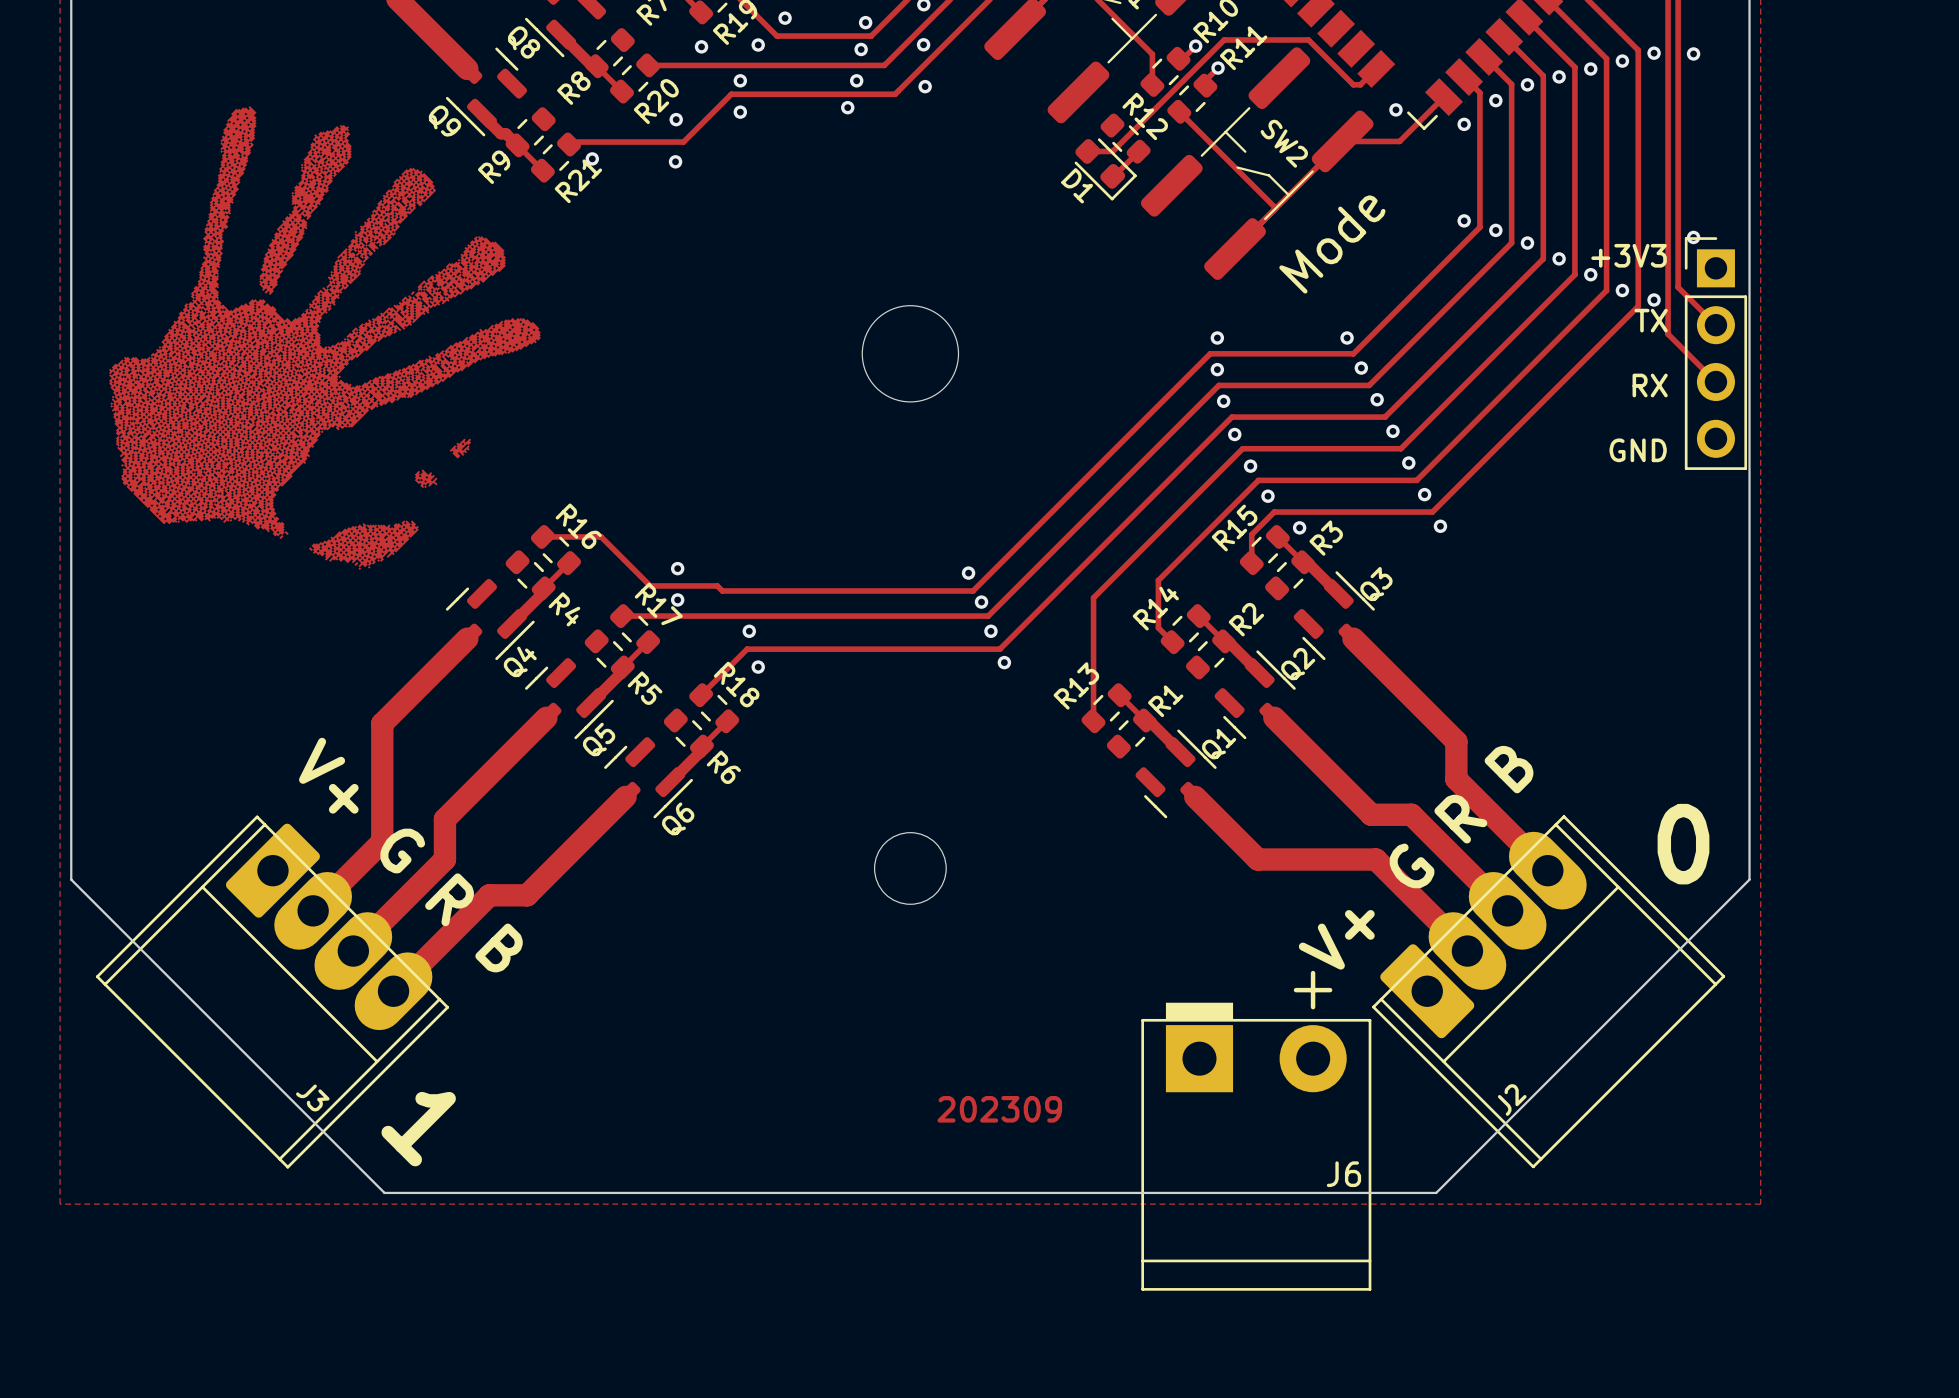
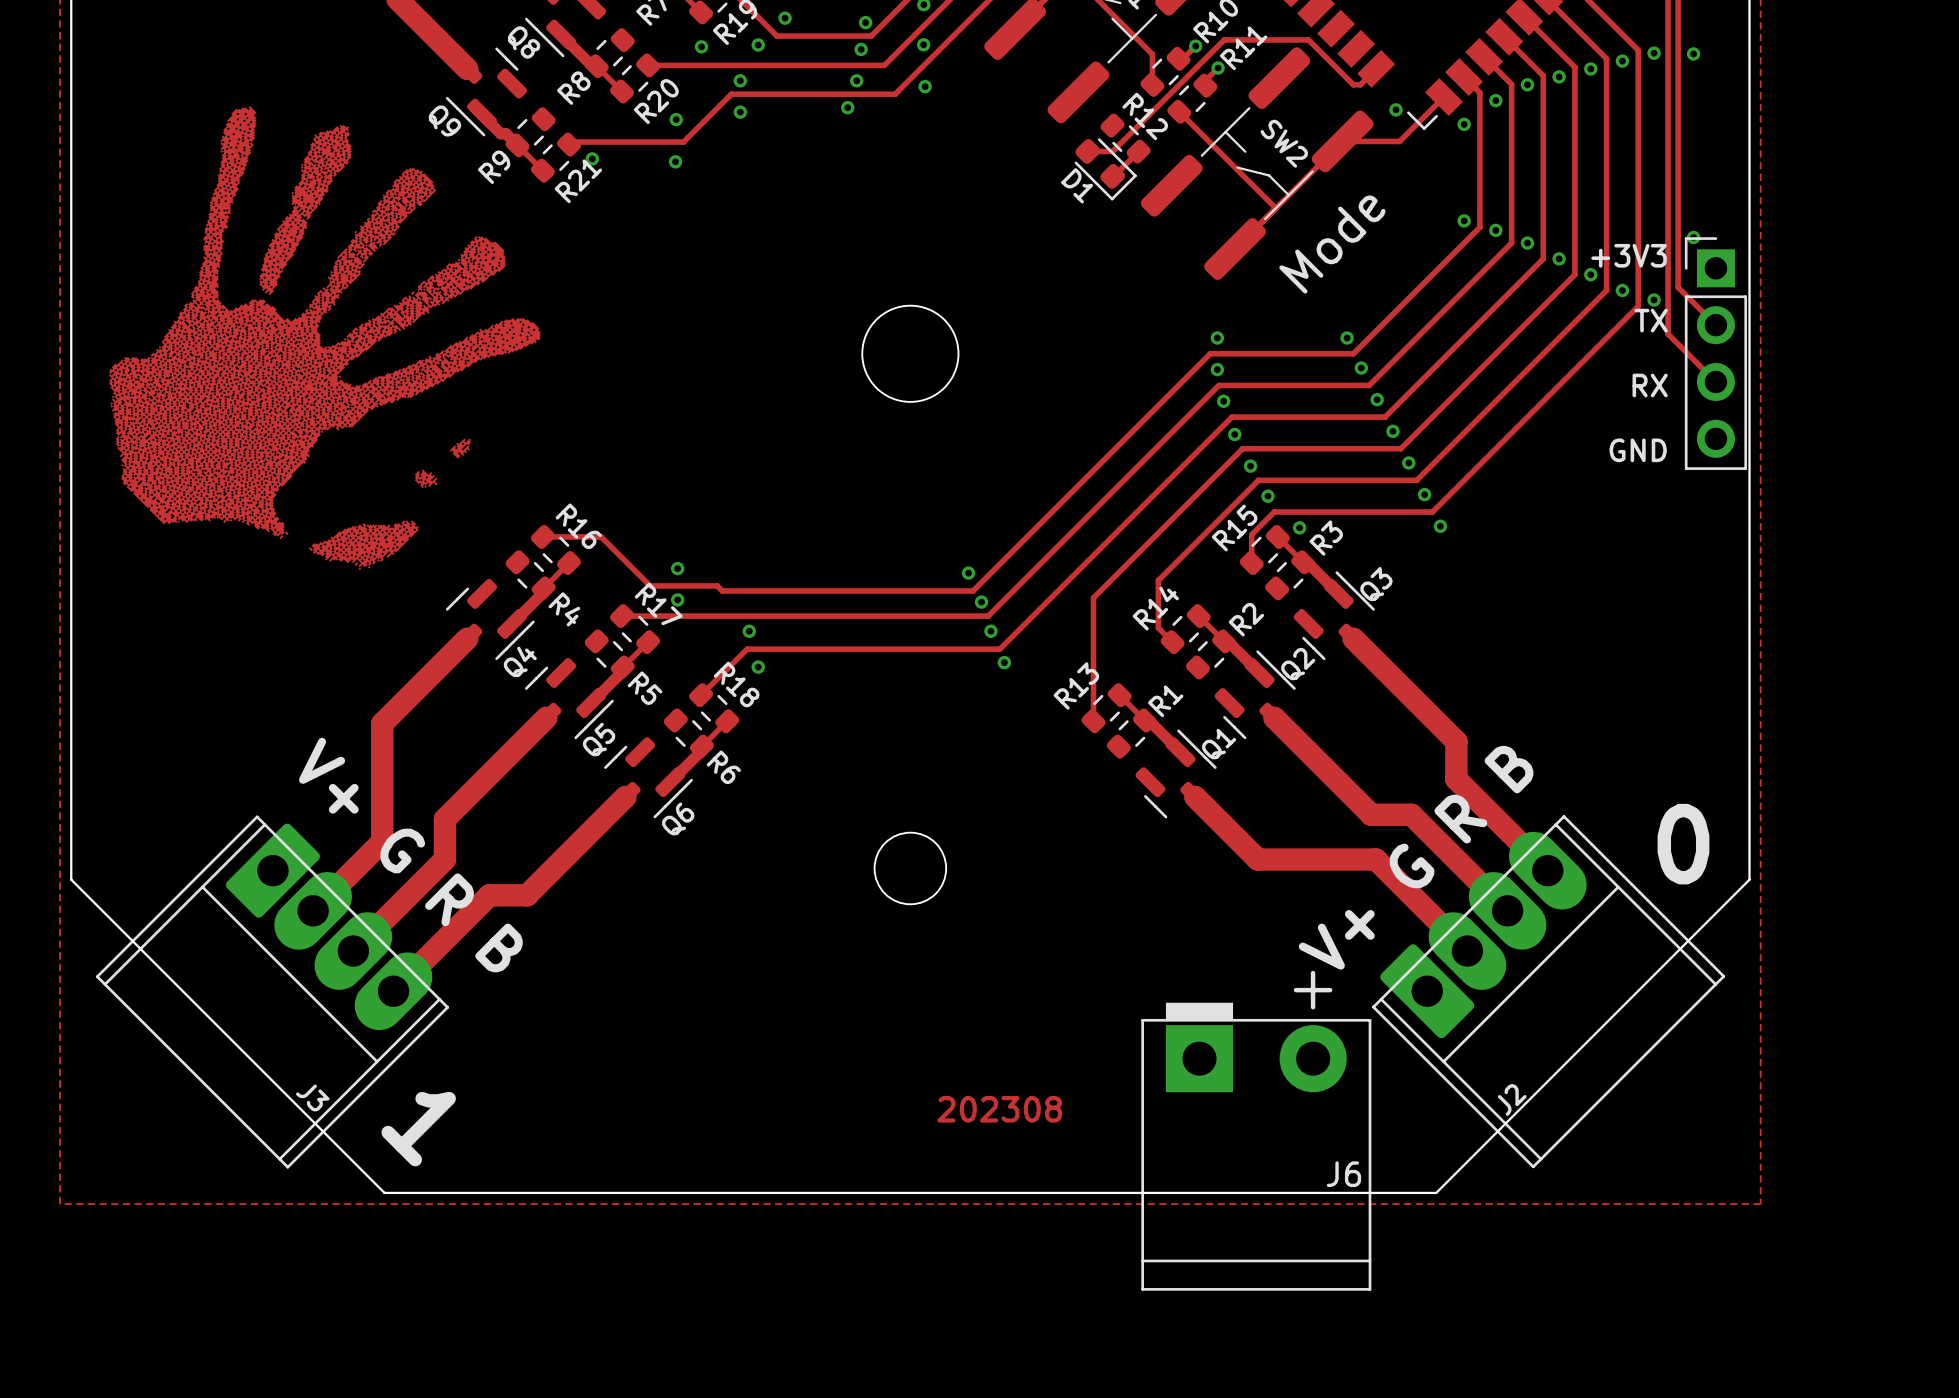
text: 202309 (999, 1109) -> 202308 (999, 1109)

